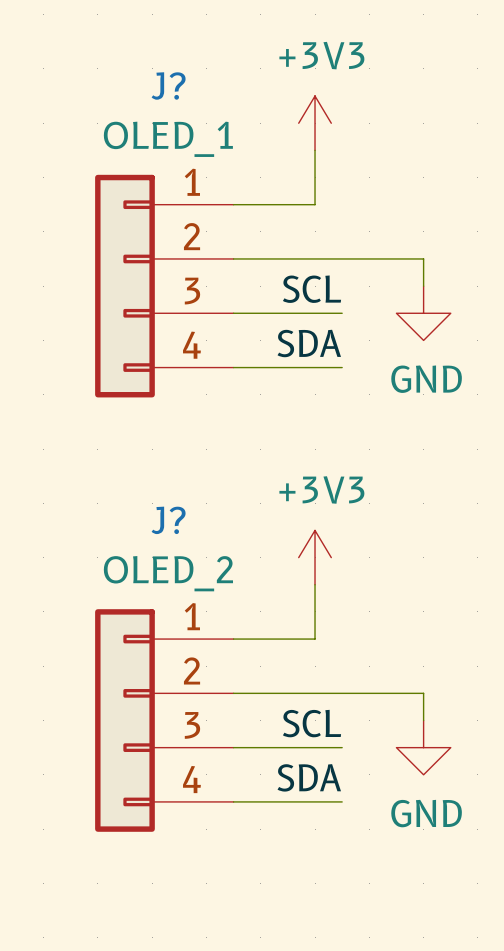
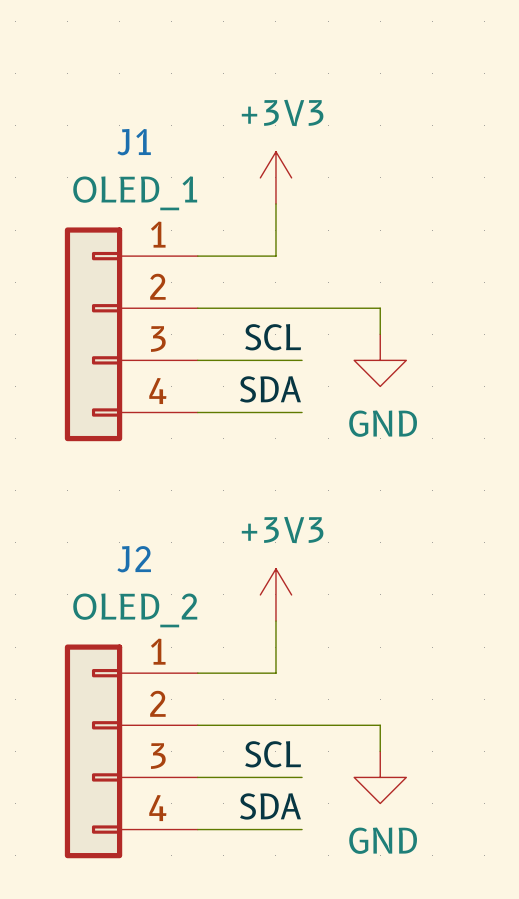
J? name: J? (168, 85) -> J1 (134, 142)
J? name: J? (168, 520) -> J2 (134, 559)

